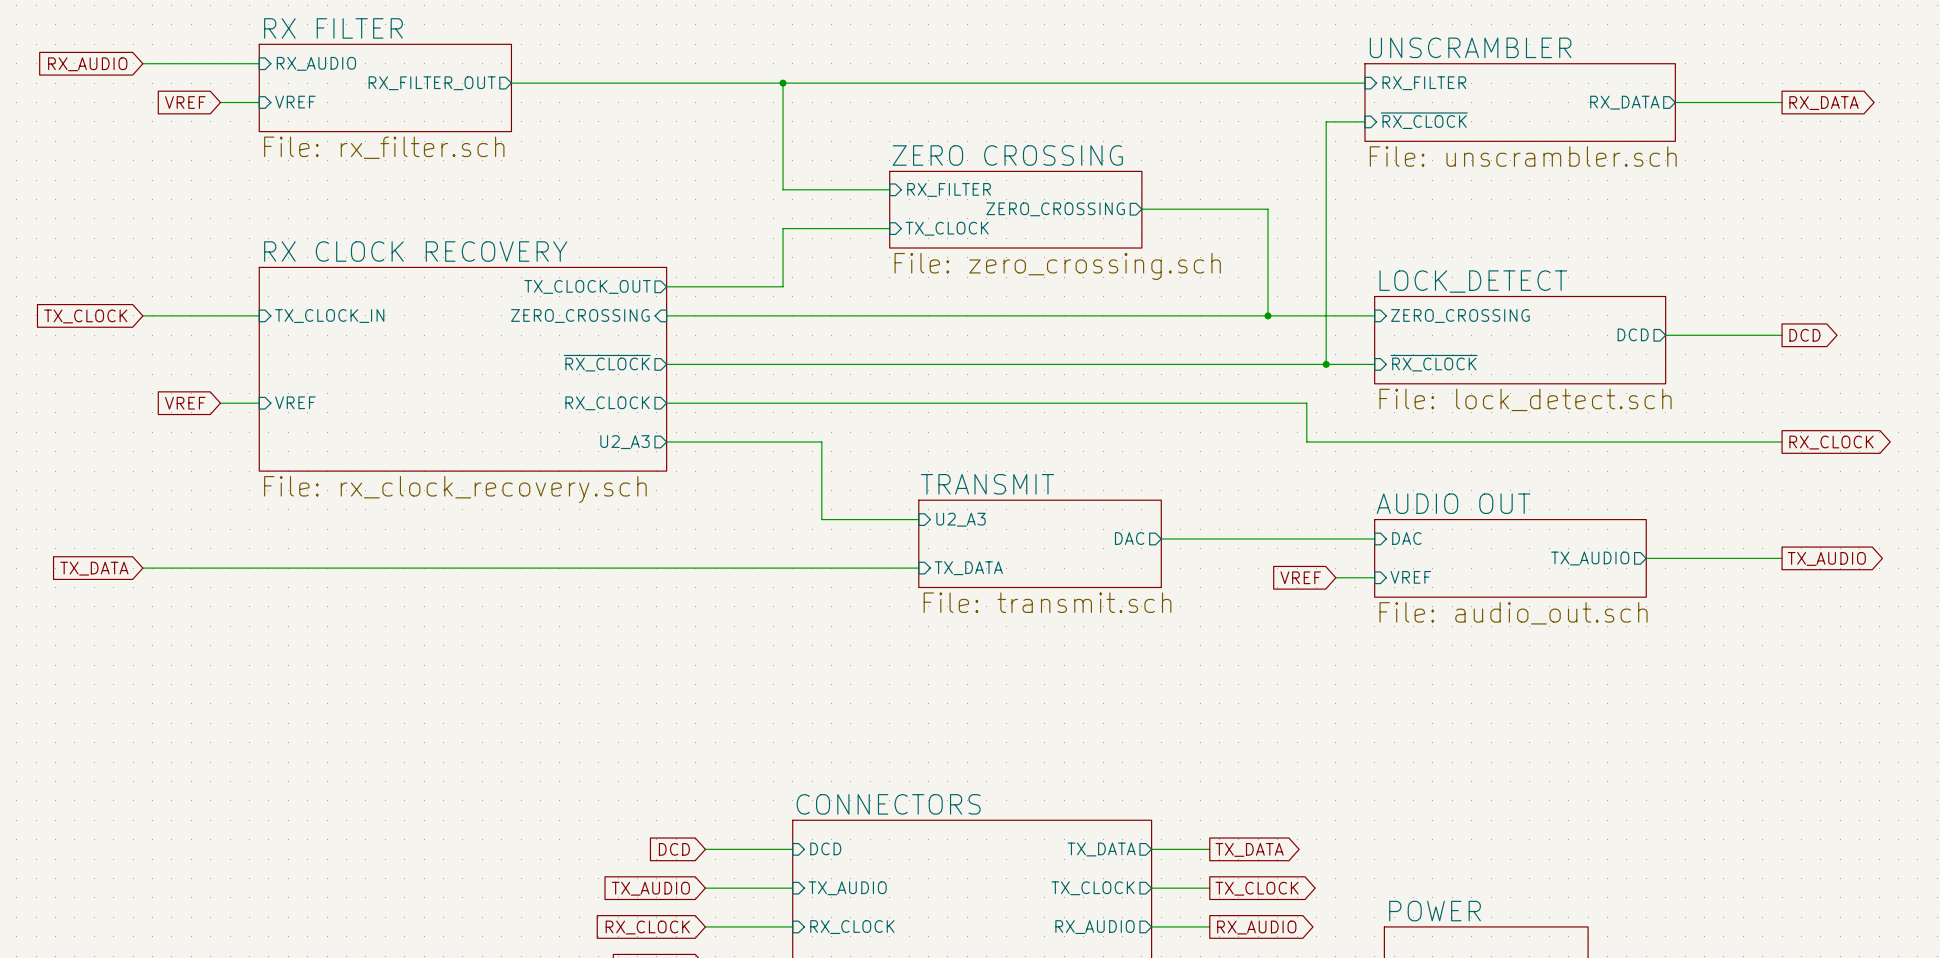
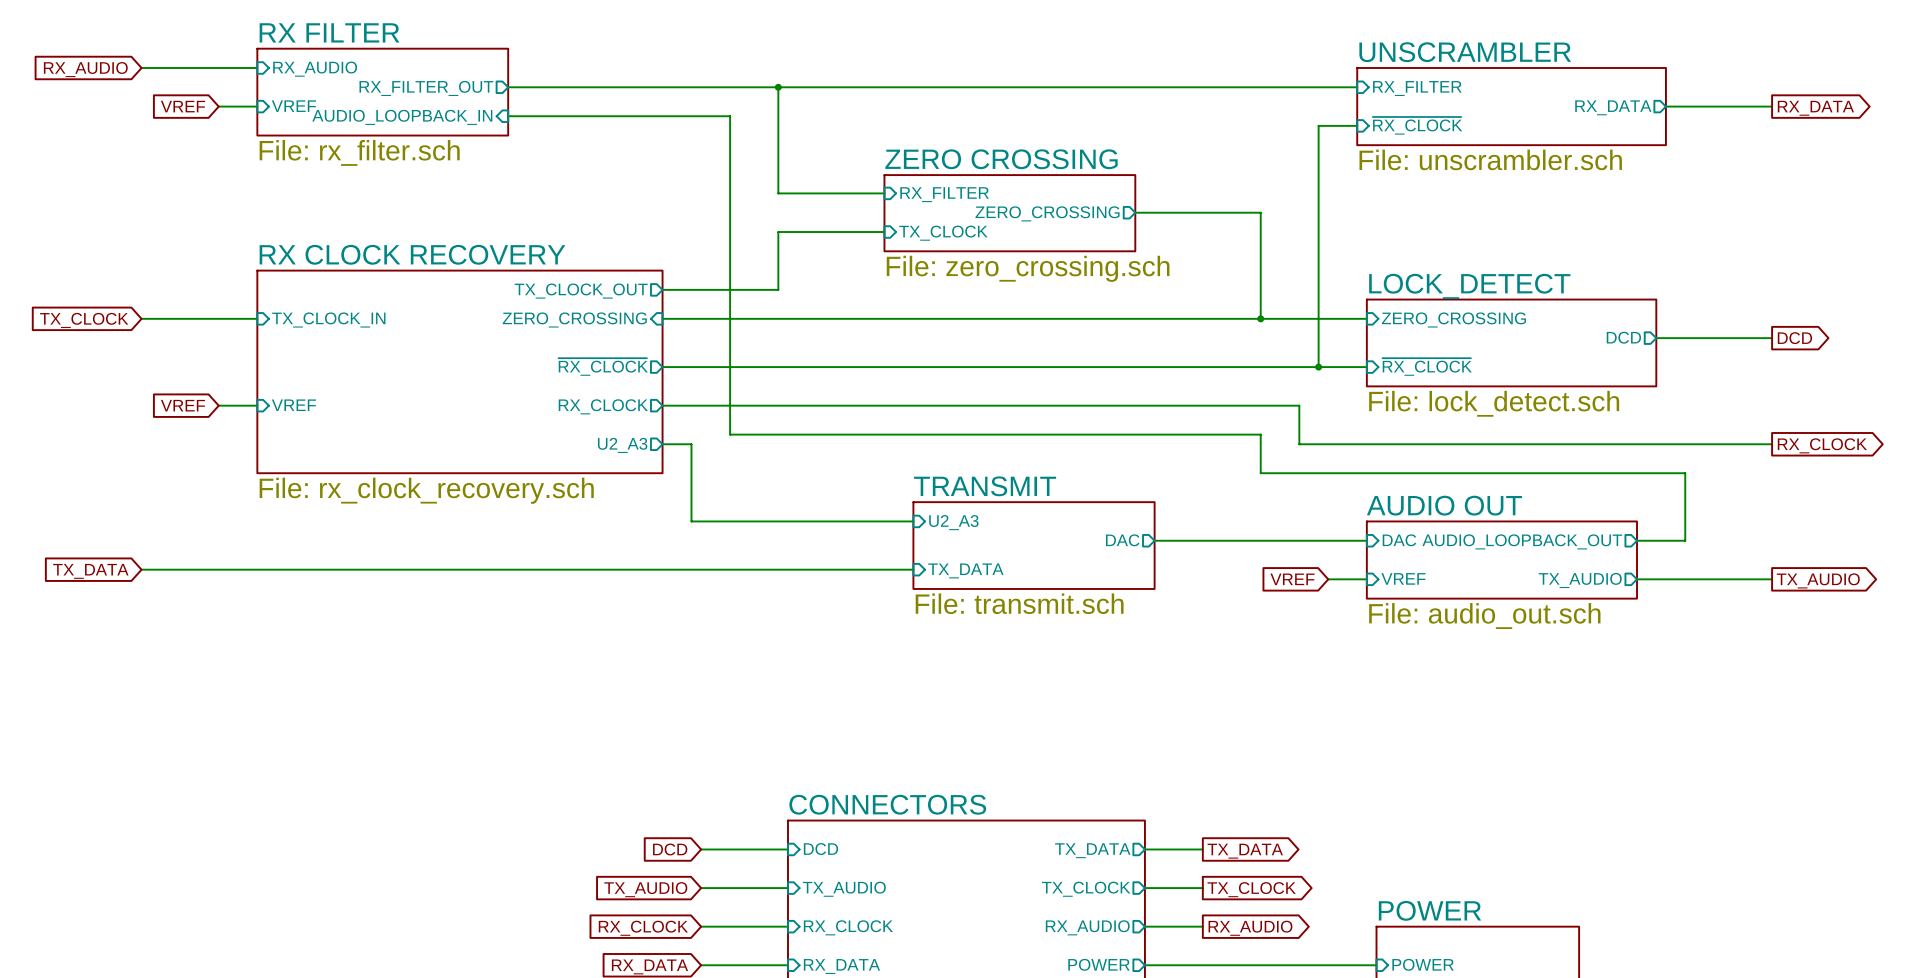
sheet pin: none -> AUDIO_LOOPBACK_IN (402, 117)
wire: none -> (508, 116) (730, 116) (730, 434) (1260, 434) (1260, 473) (1685, 473) (1685, 540) (1637, 540)
wire: (695, 441) (821, 441) (821, 519) -> (691, 444) (691, 521) (816, 521)
sheet pin: none -> AUDIO_LOOPBACK_OUT (1522, 541)
sheet pin position: TX_AUDIO (1590, 558) -> TX_AUDIO (1580, 580)
wire: (1646, 558) (1782, 558) -> (1637, 579) (1772, 579)
global label position: TX_AUDIO (1826, 558) -> TX_AUDIO (1818, 580)

